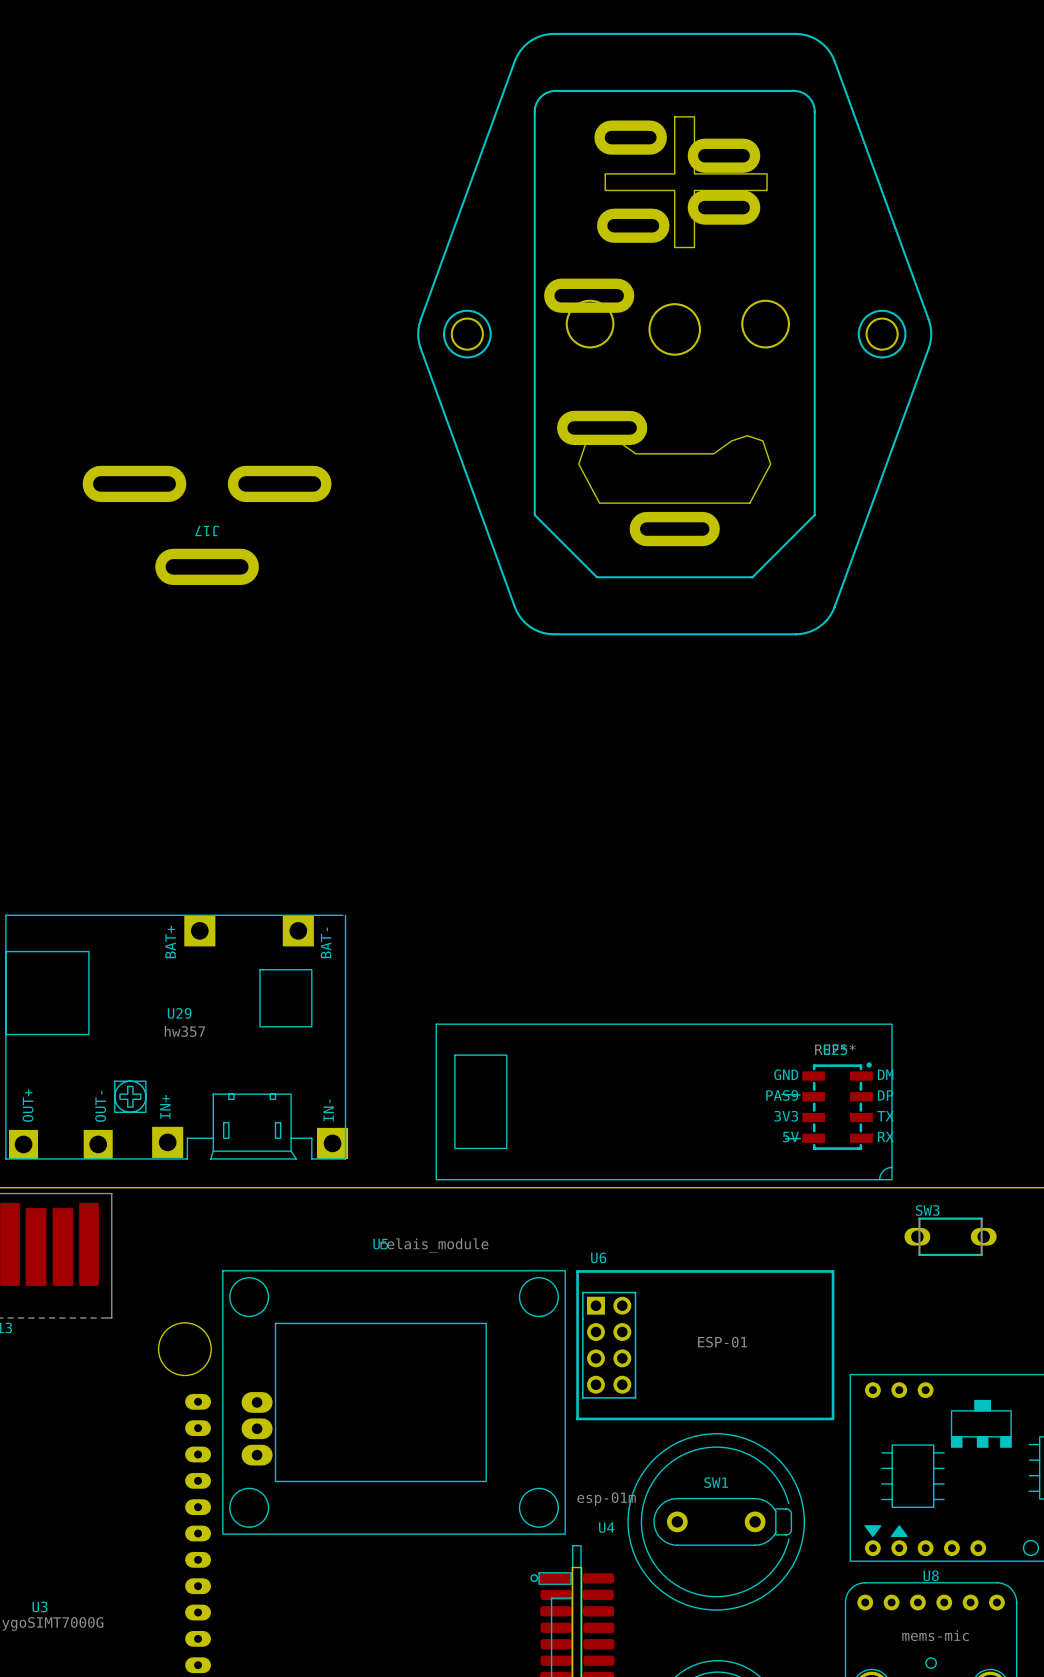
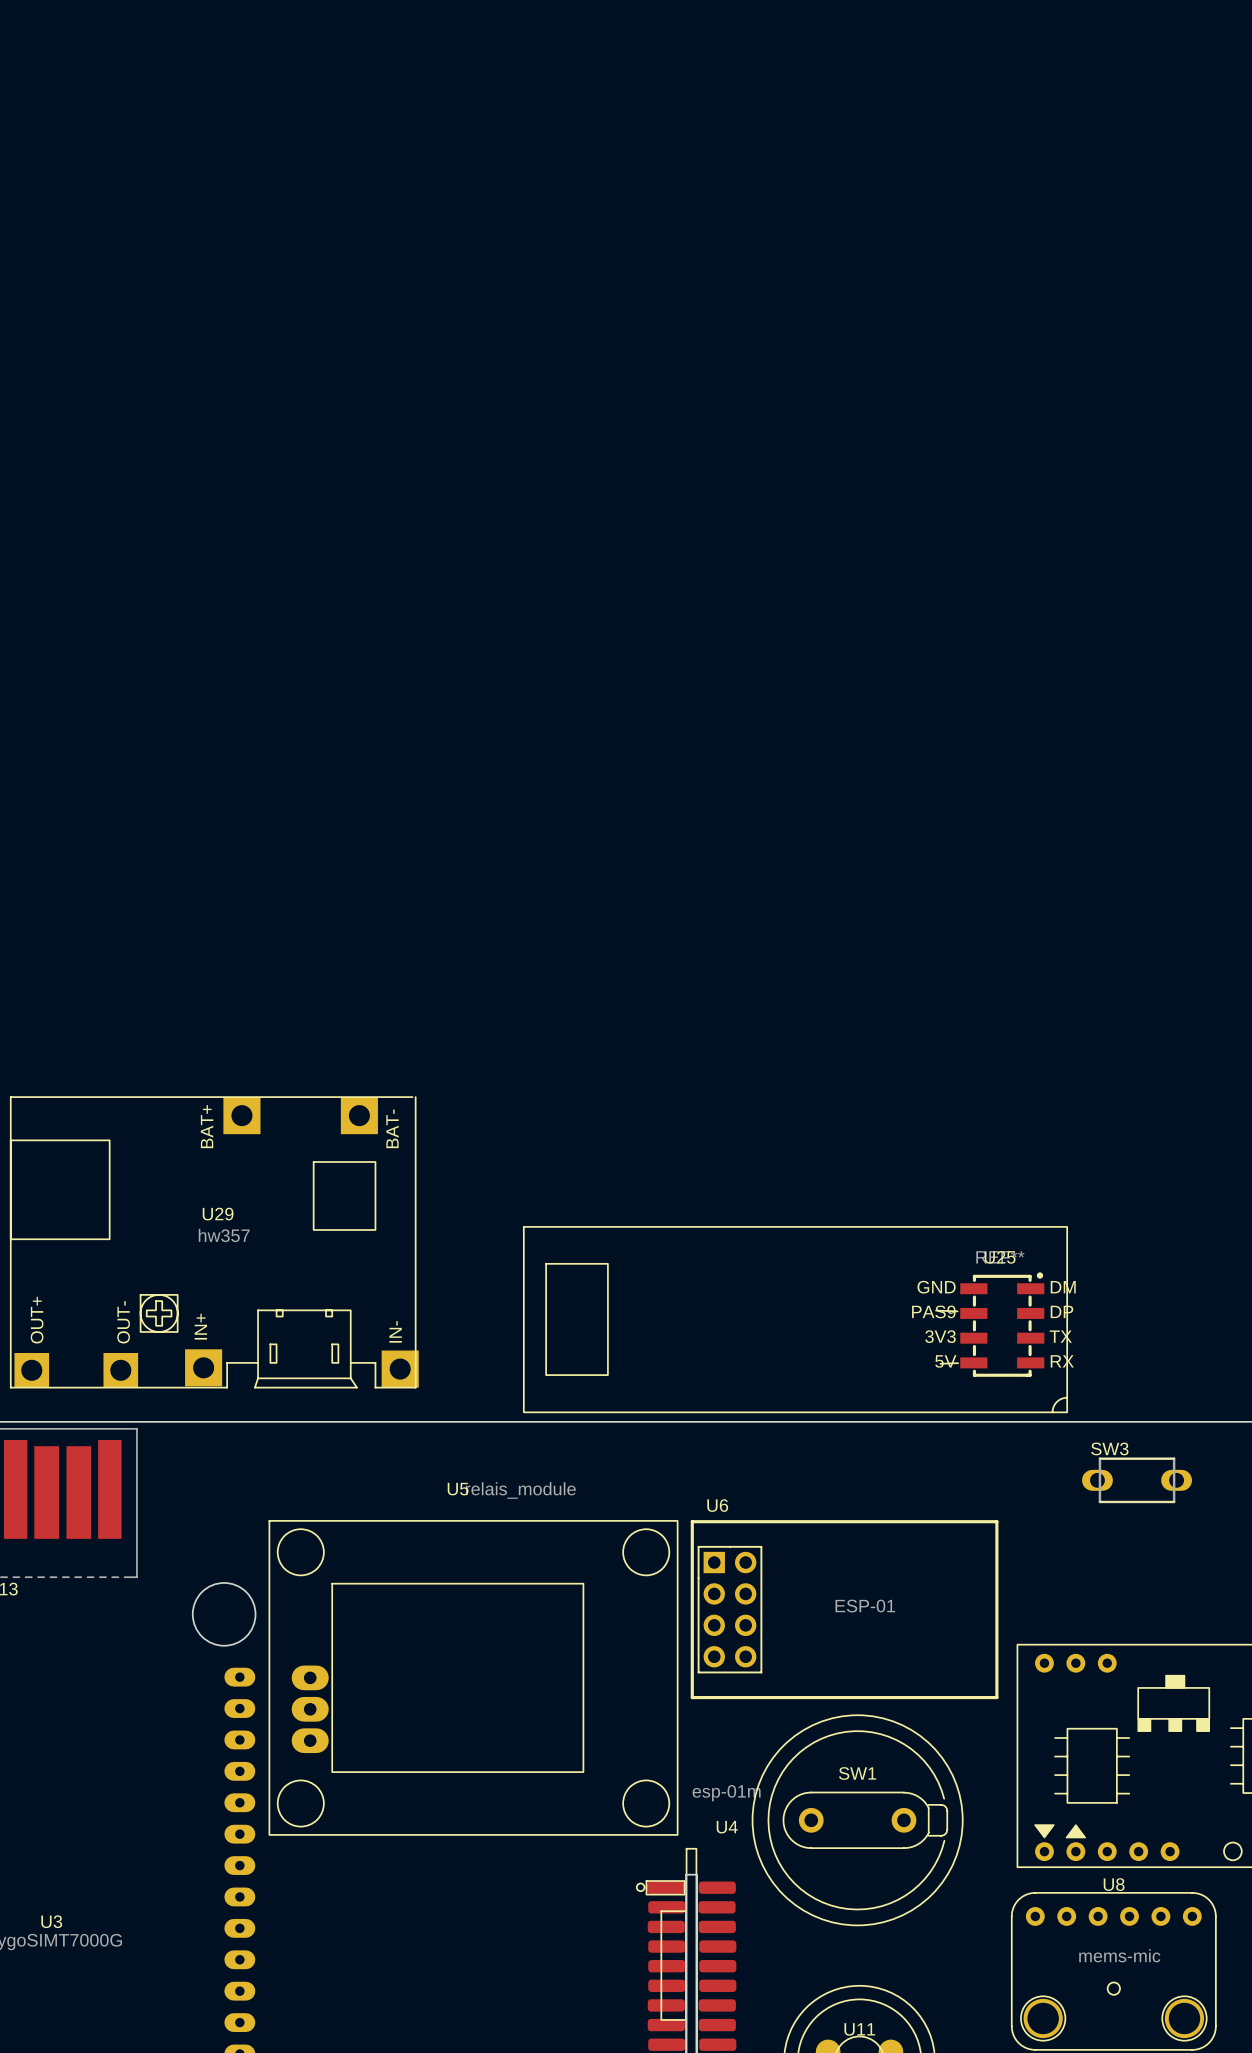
part: (674, 334) -> none
J17: (207, 525) -> none

